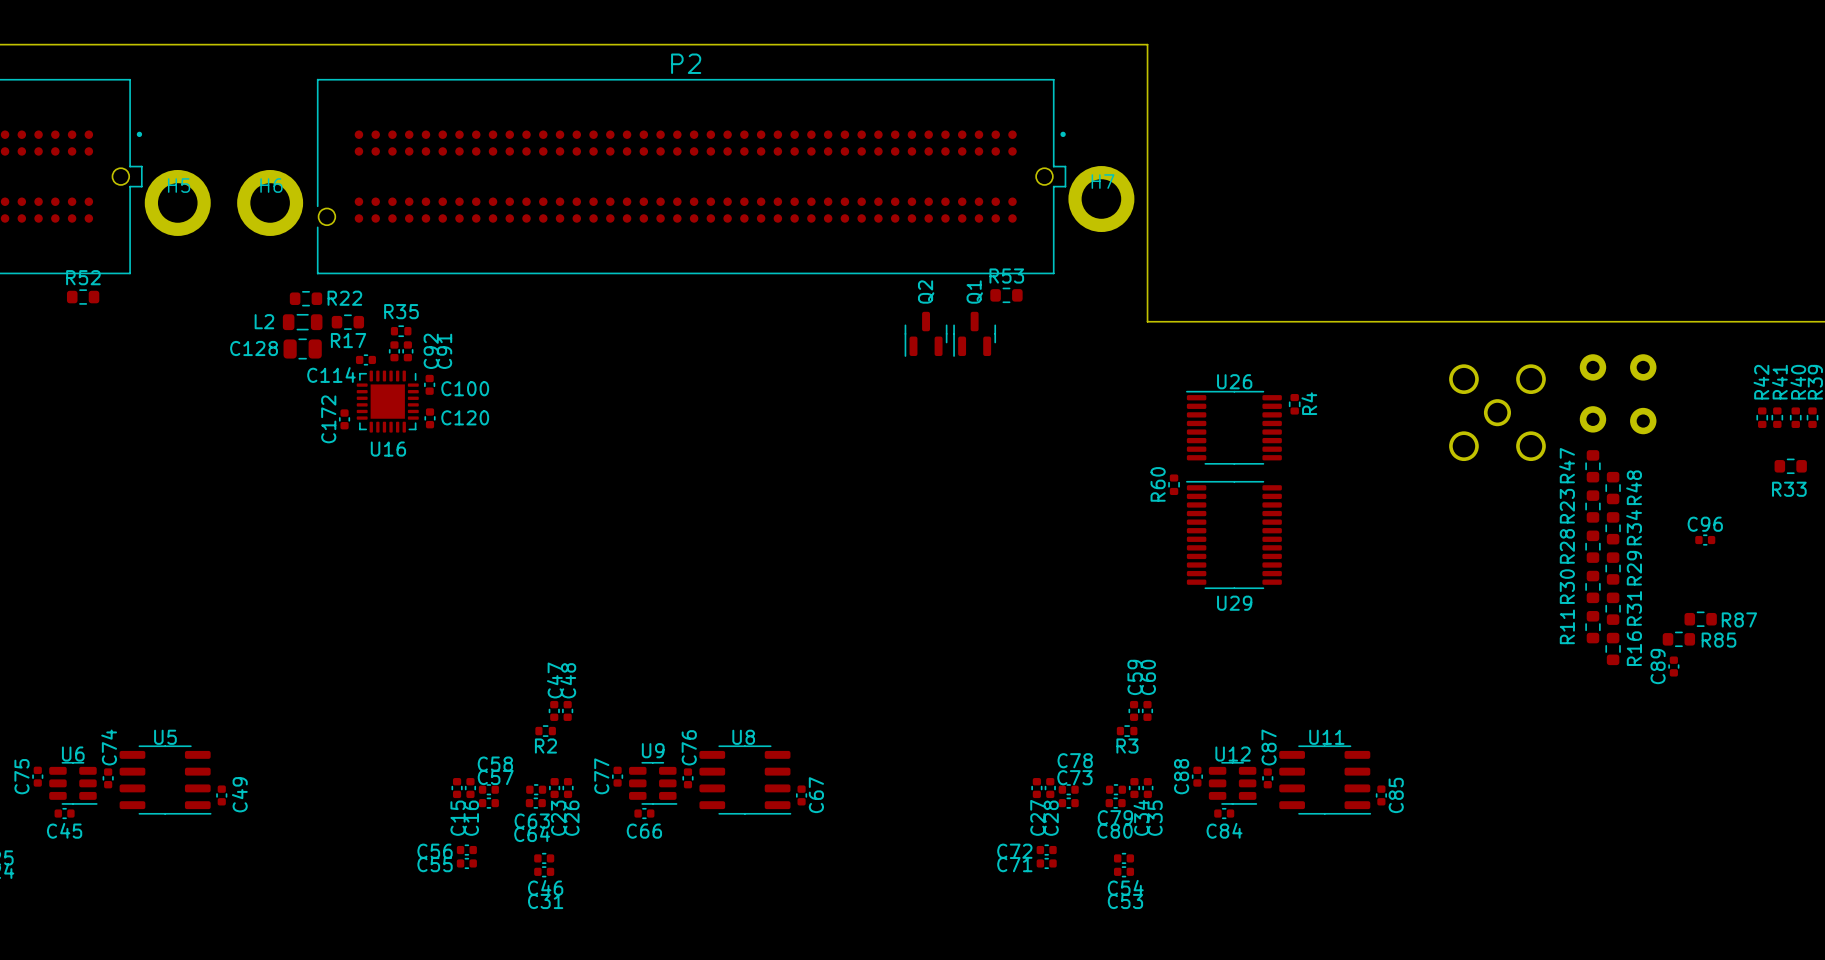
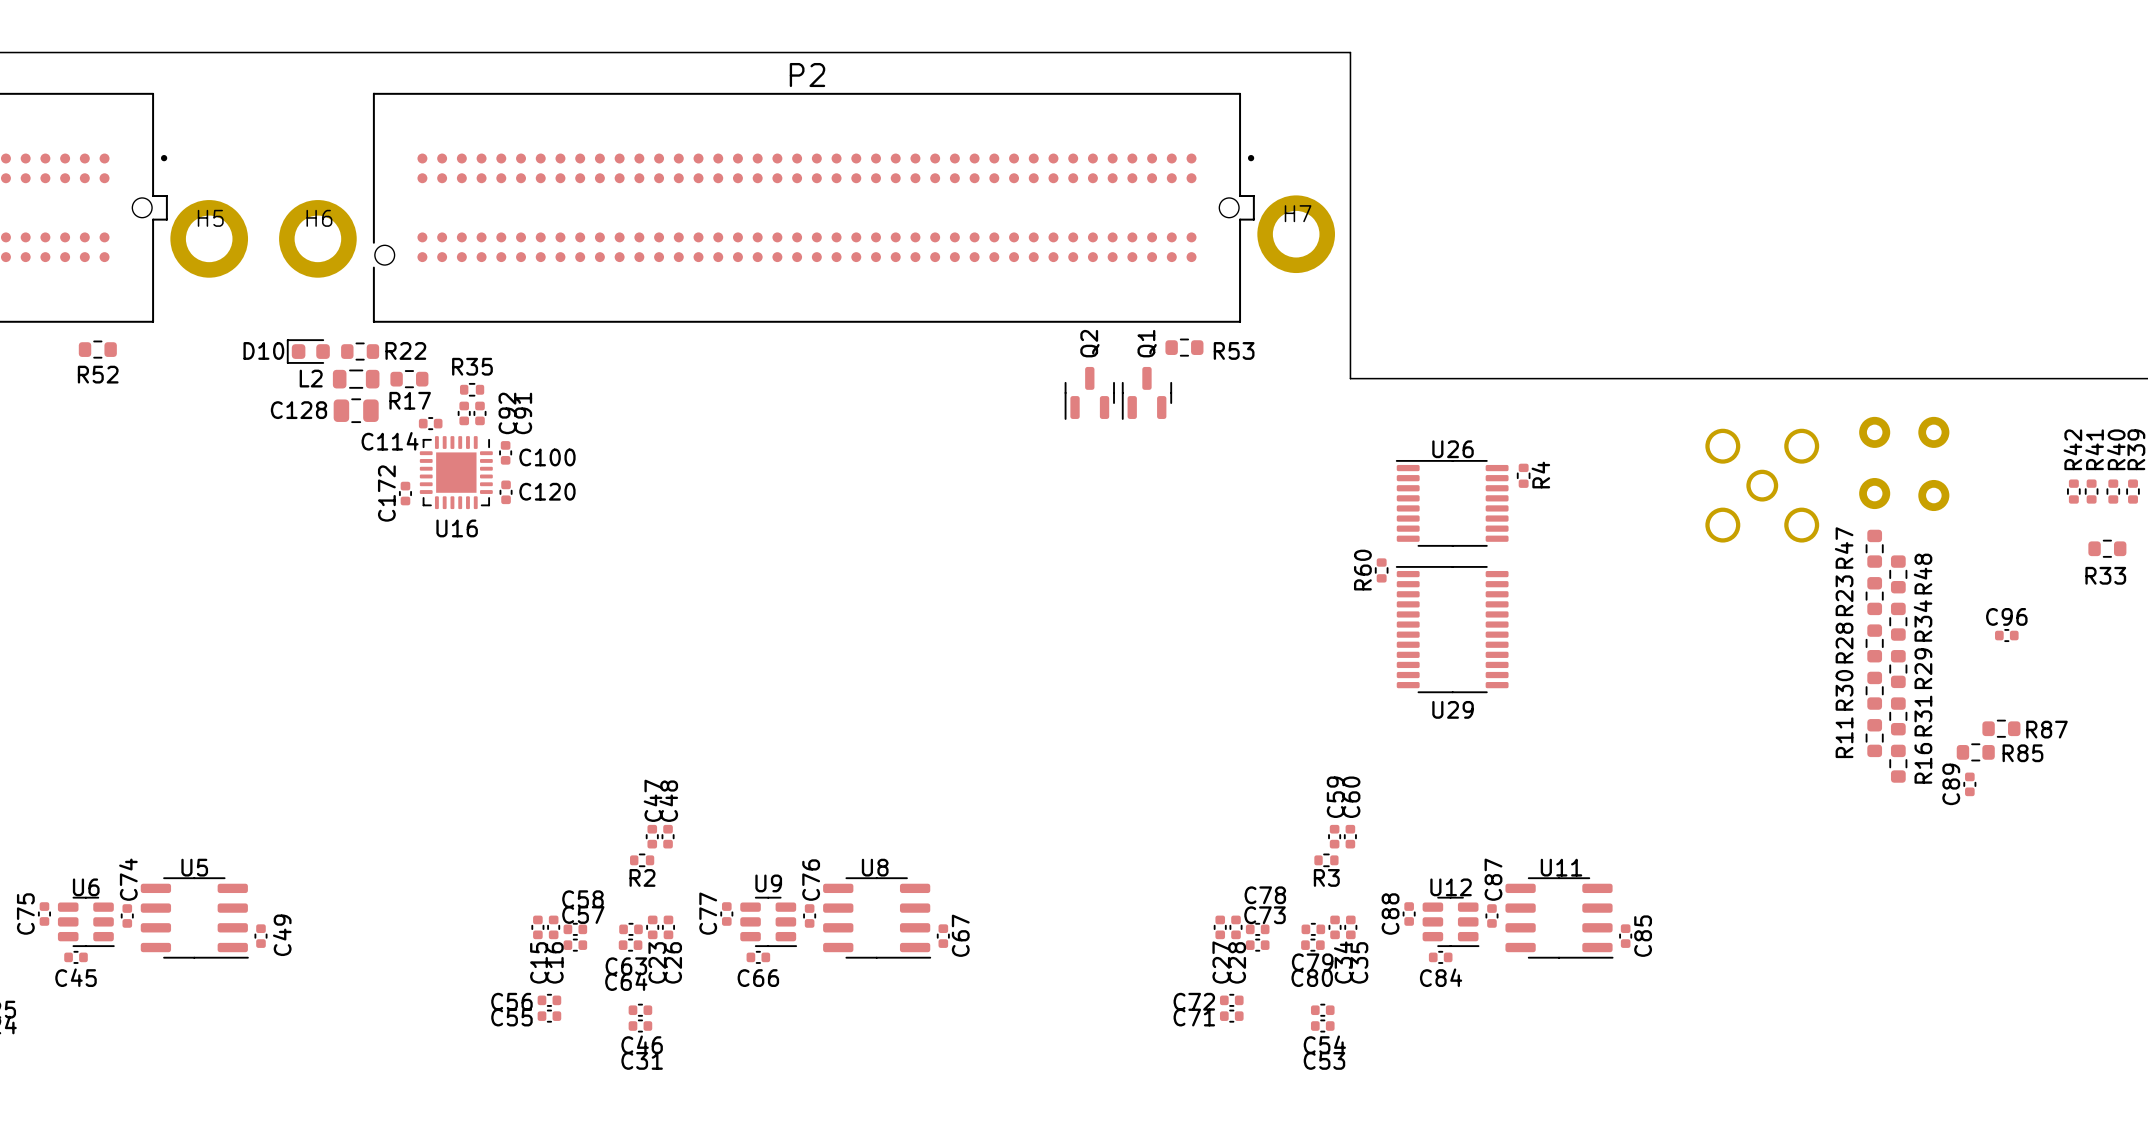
R53 name position: R53 (1006, 276) -> R53 (1234, 350)
R52 name position: R52 (83, 277) -> R52 (98, 374)
D10: none -> (308, 351)

